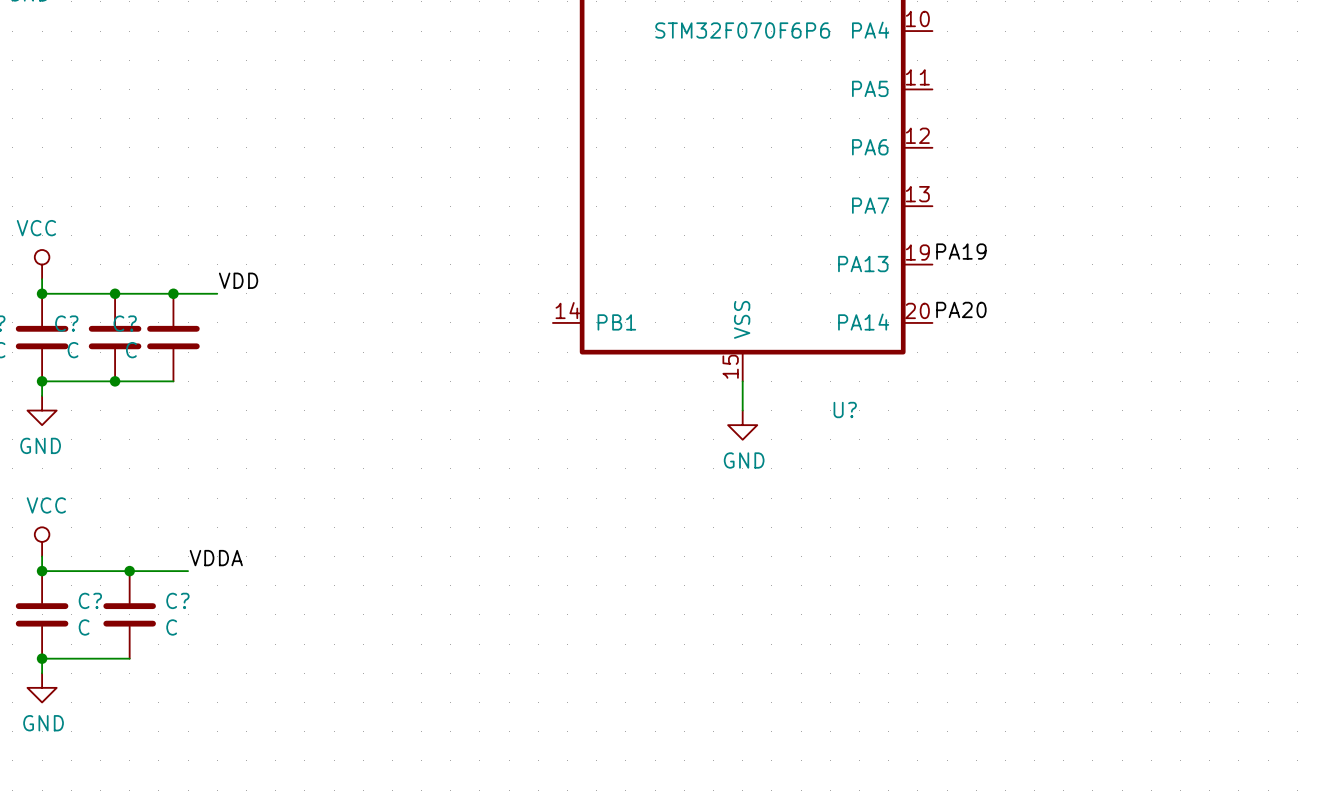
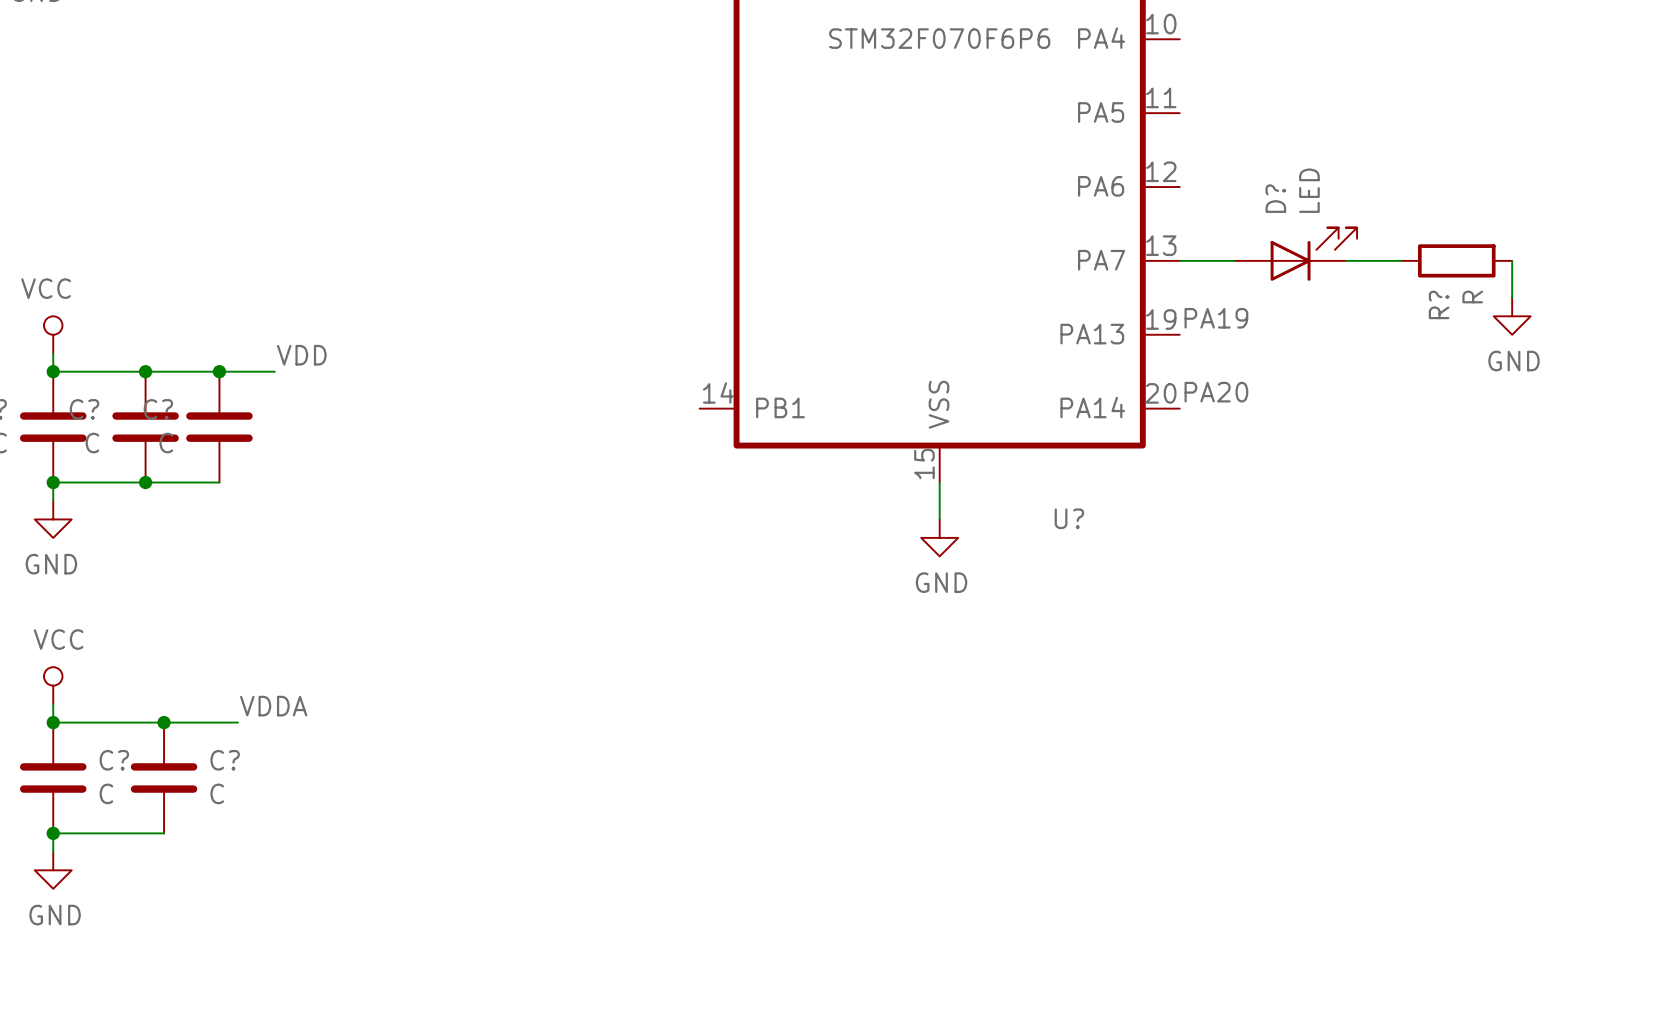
D?: none -> LED (1296, 254)
wire: none -> (1179, 260) (1235, 260)
wire: none -> (1345, 260) (1401, 260)
R?: none -> R (1456, 260)
wire: none -> (1512, 260) (1512, 297)
power symbol: none -> GND (1512, 316)

